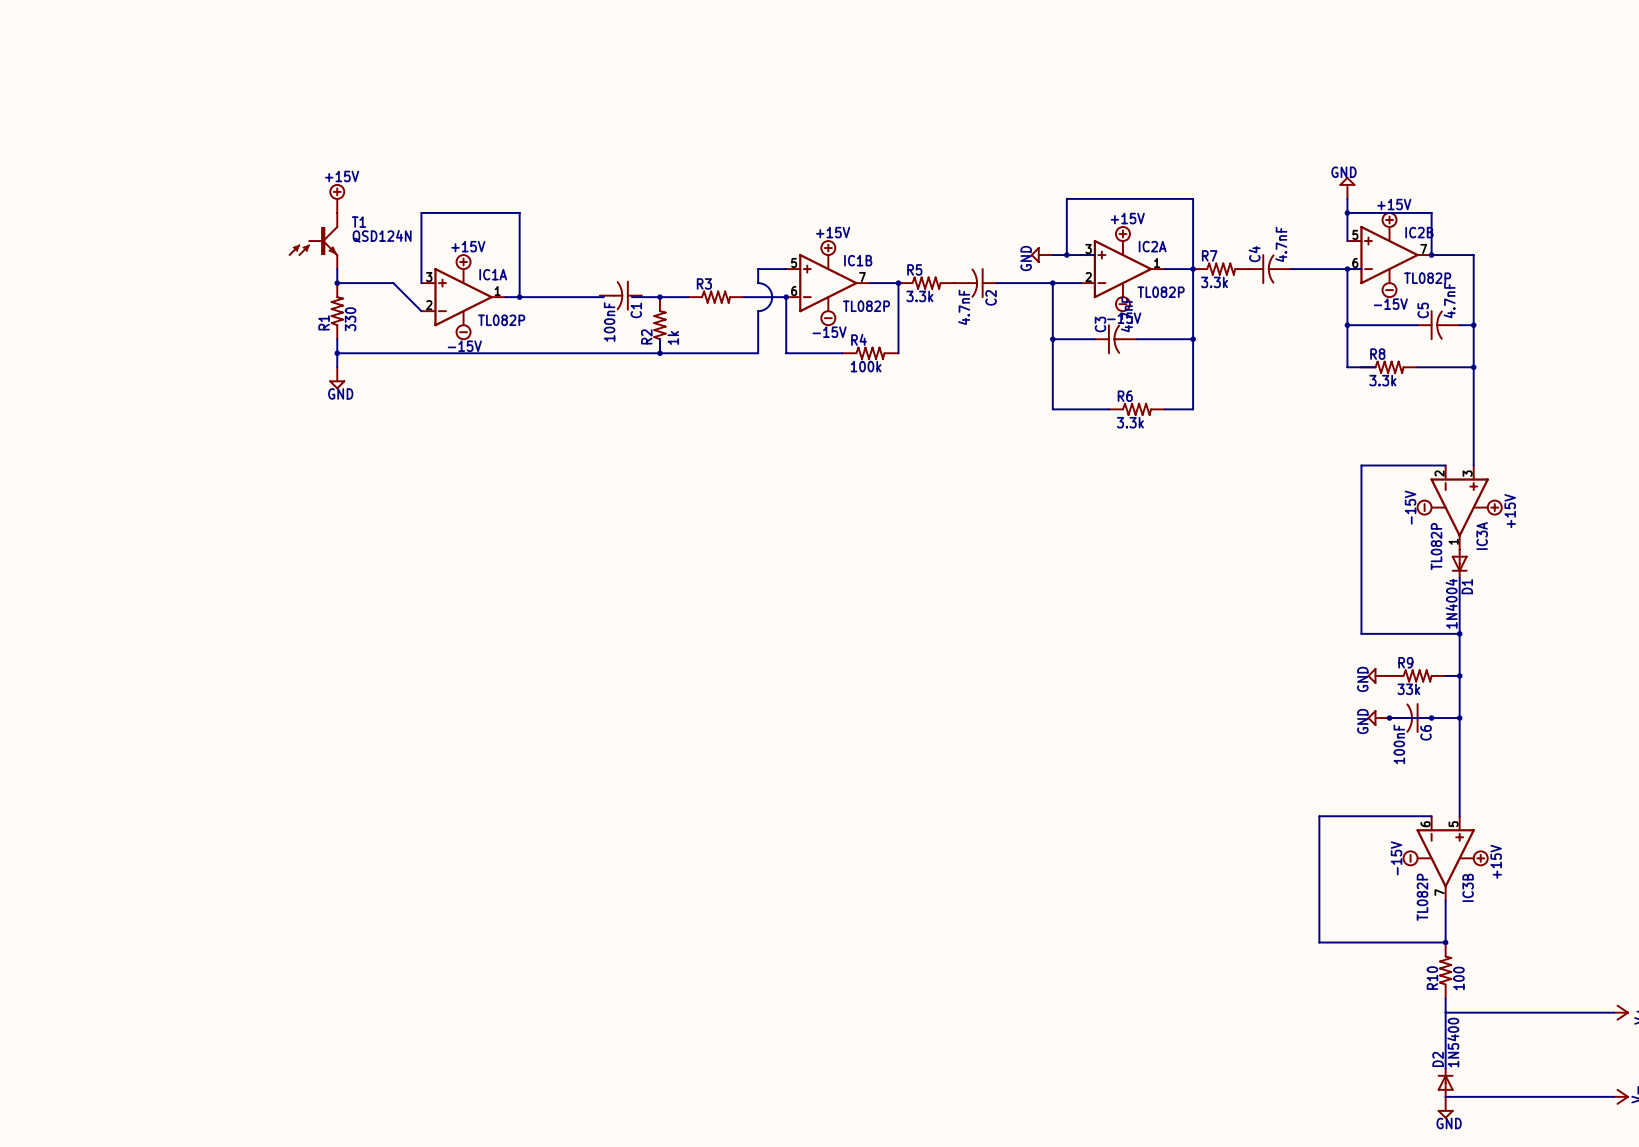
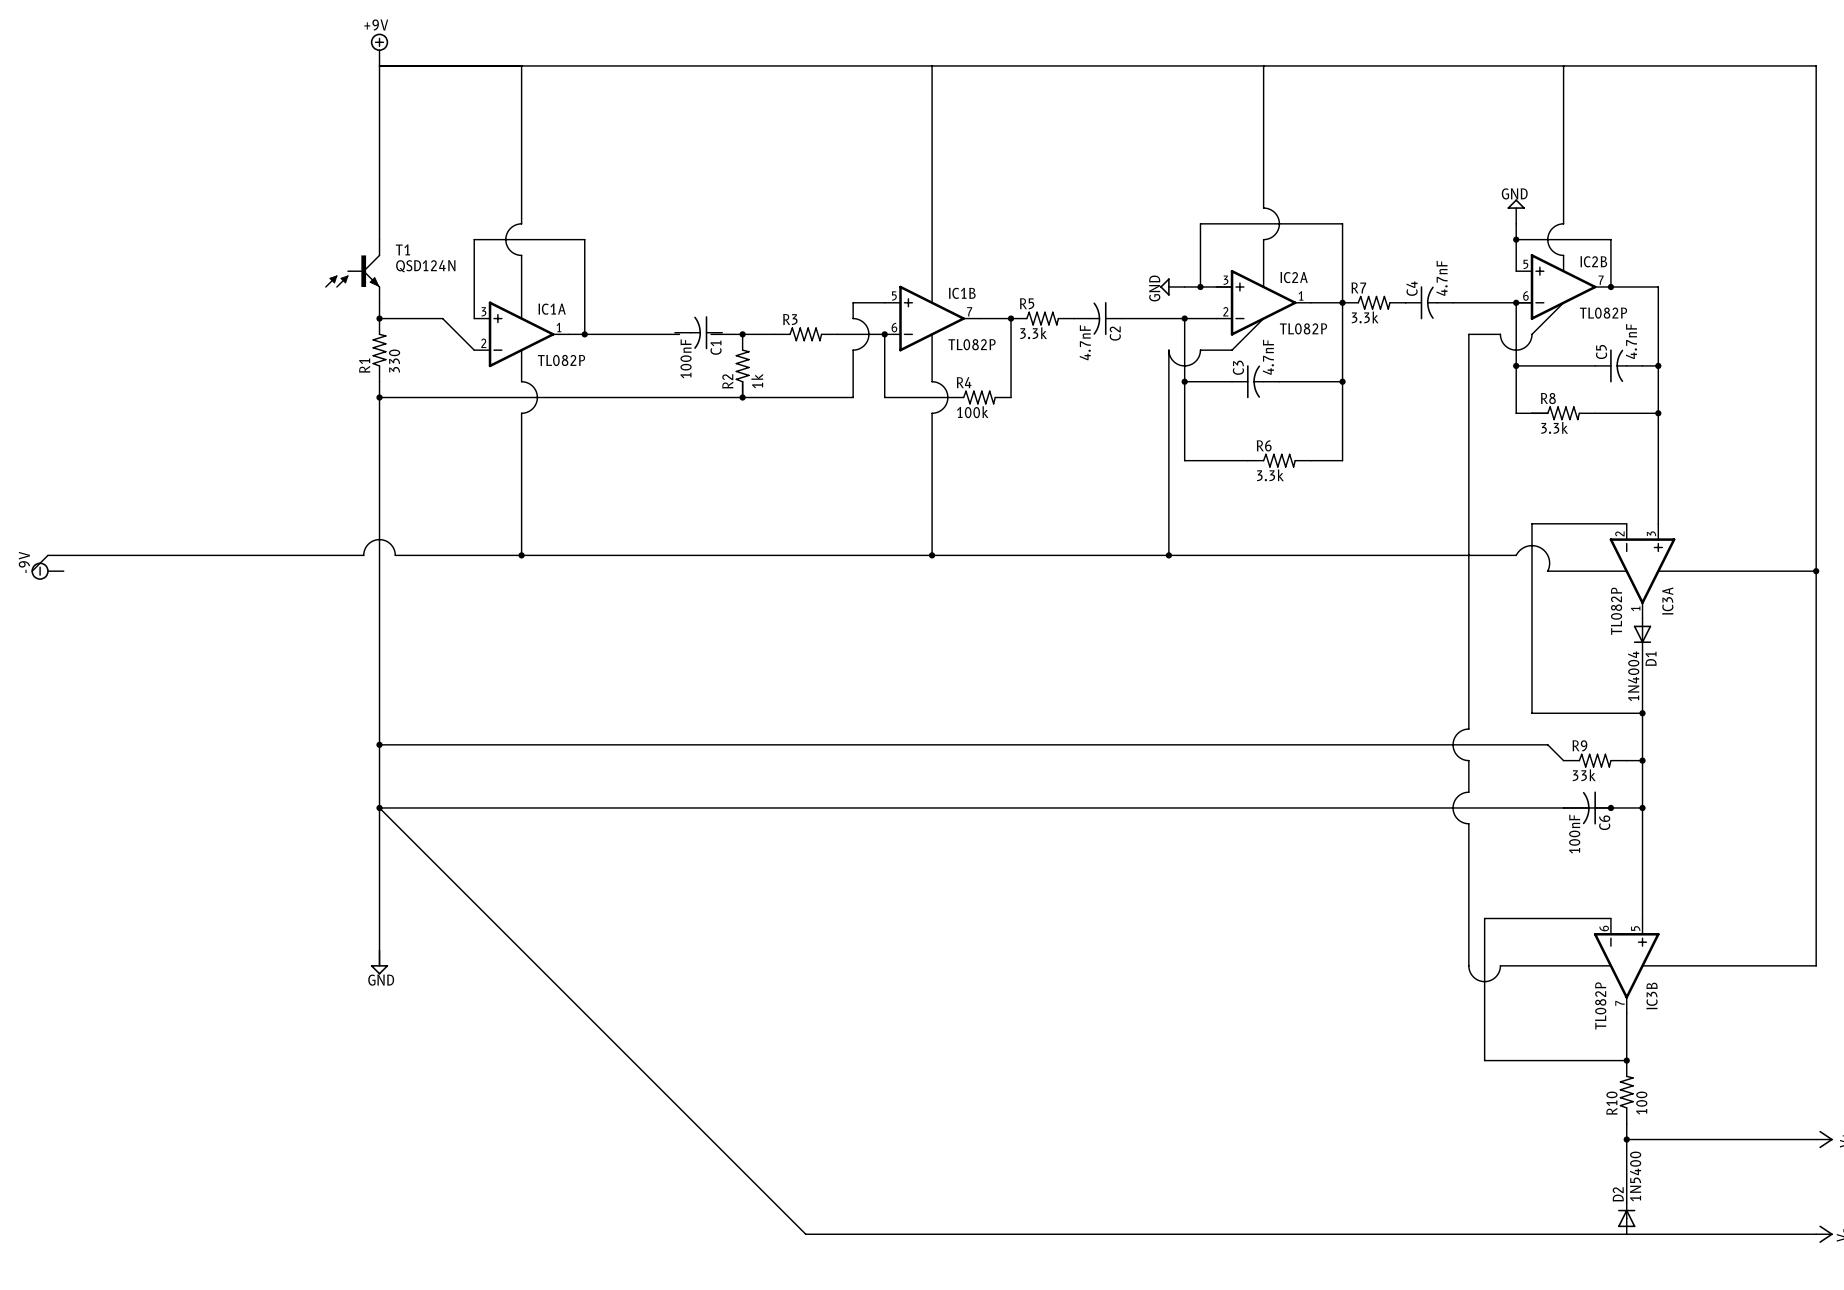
power symbol: none -> +9V (379, 49)
wire: none -> (521, 65) (521, 223) (510, 228) (505, 239) (510, 250) (521, 255) (521, 318)
wire: none -> (932, 65) (932, 302)
wire: none -> (1263, 65) (1263, 208) (1274, 212) (1279, 223) (1274, 235) (1263, 239) (1263, 286)
wire: none -> (1563, 65) (1563, 223) (1552, 228) (1547, 239) (1552, 250) (1563, 255) (1563, 271)
power symbol: +15V (337, 198) -> none
wire: none -> (379, 239) (379, 65) (1816, 65) (1816, 965) (1642, 965)
power symbol: +15V (1389, 226) -> none
power symbol: +15V (1122, 240) -> none
power symbol: +15V (828, 254) -> none
power symbol: +15V (463, 268) -> none
wire: none -> (1563, 302) (1532, 334) (1527, 345) (1520, 349) (1514, 350) (1506, 346) (1502, 342) (1500, 334) (1468, 334) (1468, 729) (1457, 733) (1453, 744) (1457, 756) (1468, 760) (1468, 792) (1457, 796) (1454, 801) (1453, 810) (1457, 819) (1468, 823) (1468, 965) (1473, 977) (1480, 981) (1490, 980) (1498, 973) (1500, 965) (1610, 965)
wire: none -> (1263, 318) (1232, 350) (1200, 350) (1197, 359) (1188, 365) (1180, 365) (1175, 362) (1171, 358) (1168, 350) (1168, 555)
power symbol: -15V (1389, 283) -> none
wire: none -> (932, 334) (932, 381) (943, 386) (947, 397) (943, 408) (932, 413) (932, 555)
power symbol: -15V (1122, 297) -> none
wire: none -> (521, 350) (521, 381) (532, 386) (537, 397) (532, 408) (521, 413) (521, 555)
power symbol: -15V (828, 311) -> none
power symbol: -15V (463, 325) -> none
wire: none -> (379, 413) (379, 965)
power symbol: GND (337, 378) -> none
junction: none -> (521, 555)
junction: none -> (932, 555)
junction: none -> (1168, 555)
wire: none -> (32, 571) (47, 555) (363, 555) (368, 544) (379, 539) (390, 544) (395, 555) (1516, 555) (1524, 547) (1533, 545) (1541, 548) (1547, 555) (1549, 562) (1547, 571) (1626, 571)
power symbol: none -> -9V (47, 571)
power symbol: -15V (1431, 507) -> none
wire: none -> (1658, 571) (1816, 571)
power symbol: +15V (1488, 507) -> none
junction: none -> (1816, 571)
wire: none -> (379, 744) (1547, 744) (1563, 760)
junction: none -> (379, 744)
power symbol: GND (1378, 675) -> none
junction: none -> (379, 807)
power symbol: GND (1378, 718) -> none
wire: none -> (1563, 807) (379, 807) (805, 1234) (1626, 1234)
junction: (1389, 718) -> none
power symbol: none -> GND (379, 962)
power symbol: -15V (1417, 858) -> none
power symbol: +15V (1474, 858) -> none
junction: none -> (1626, 1139)
power symbol: GND (1445, 1107) -> none

